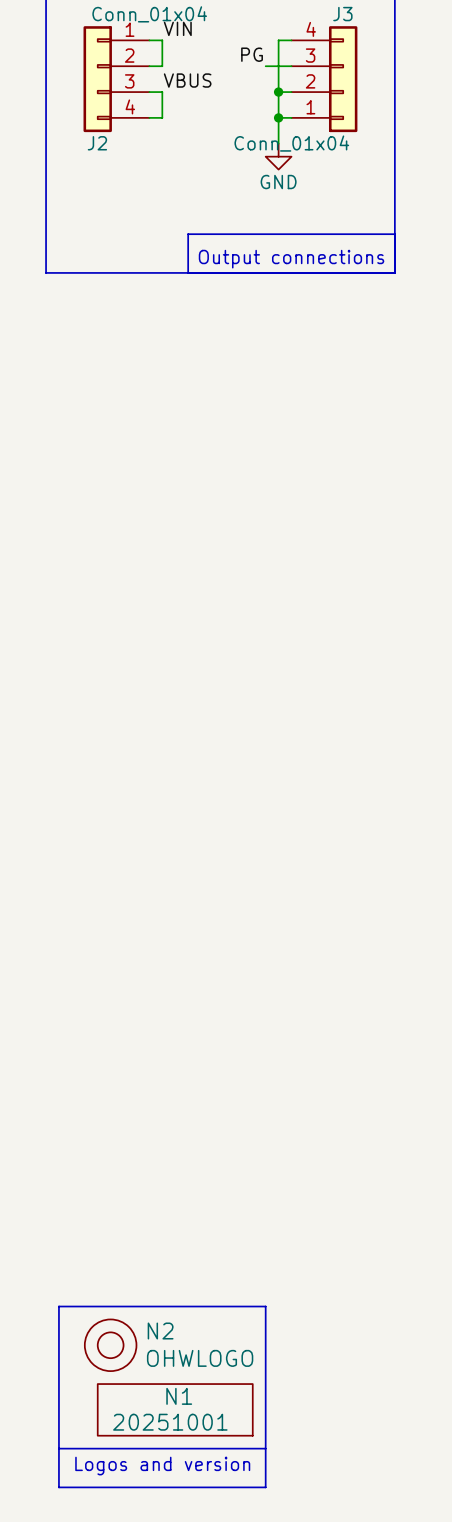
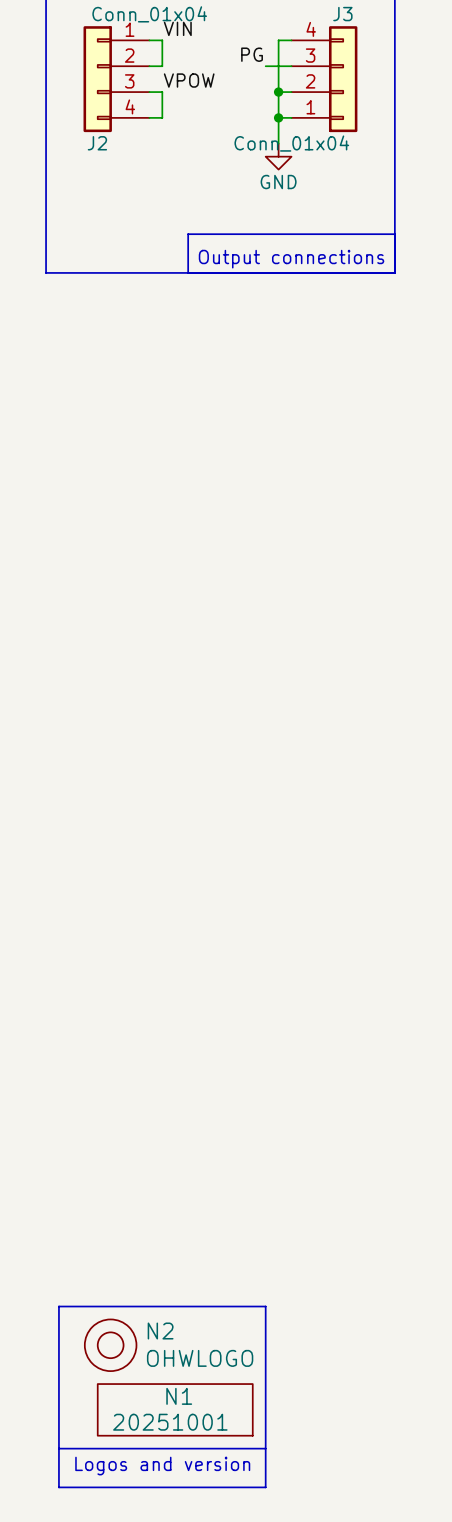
label: VBUS (187, 80) -> VPOW (189, 80)

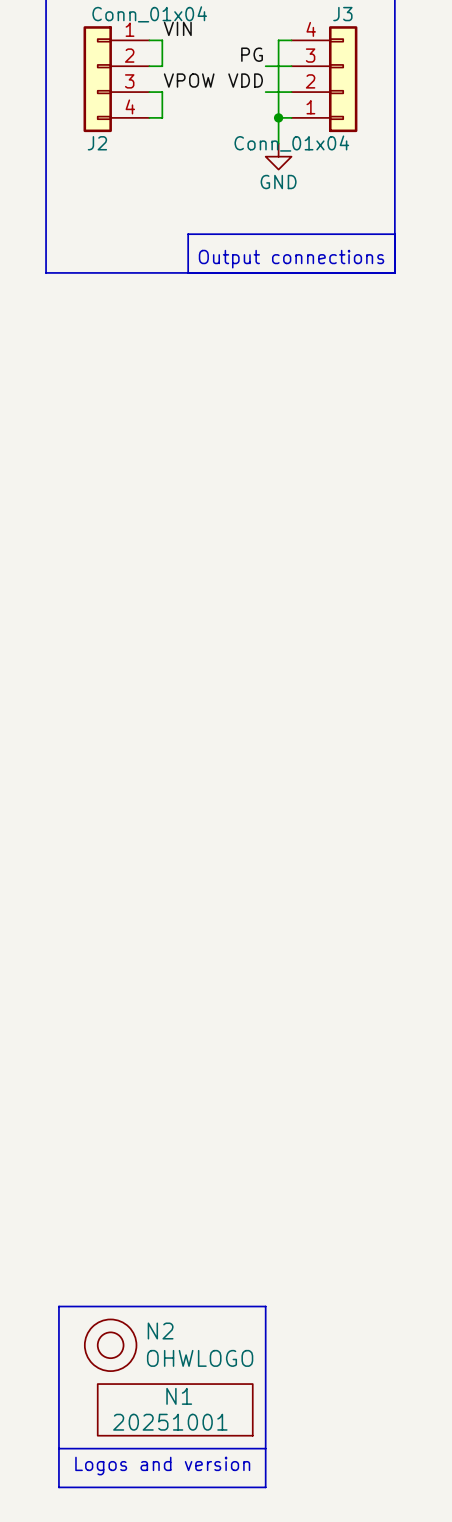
label: none -> VDD (245, 80)
wire: none -> (265, 92) (278, 92)
junction: (278, 92) -> none

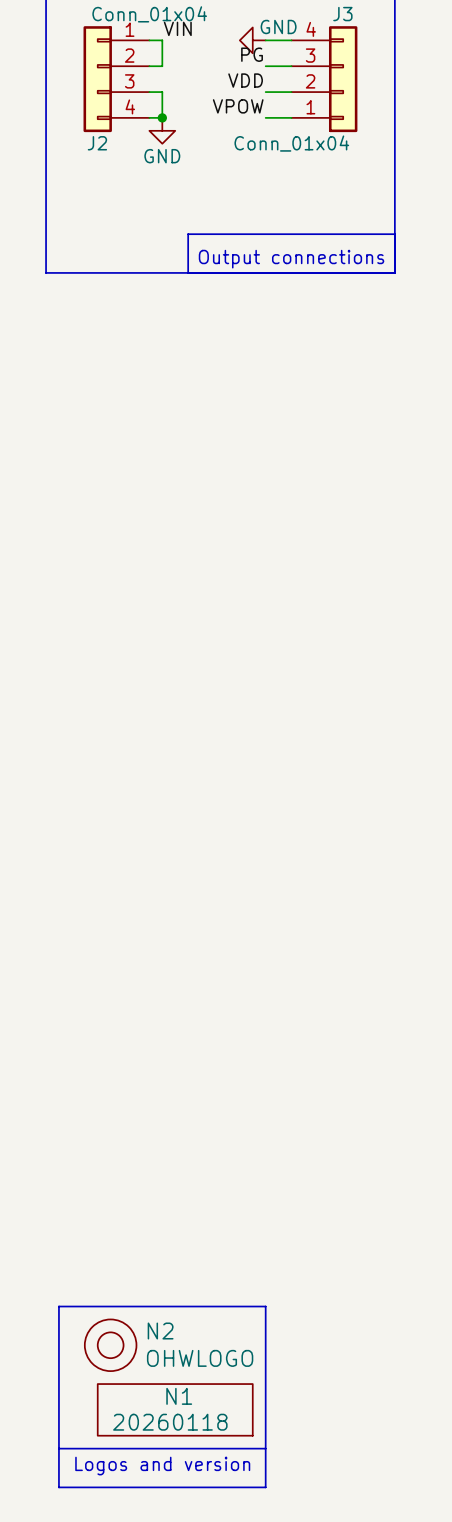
power symbol: none -> GND (252, 40)
wire: (278, 40) (278, 143) -> (278, 40) (265, 40)
label position: VPOW (189, 80) -> VPOW (238, 106)
junction: none -> (162, 117)
wire: none -> (265, 117) (278, 117)
junction: (278, 117) -> none
power symbol: none -> GND (162, 130)
power symbol: GND (278, 156) -> none
N1 value: 20251001 (170, 1422) -> 20260118 (170, 1422)

